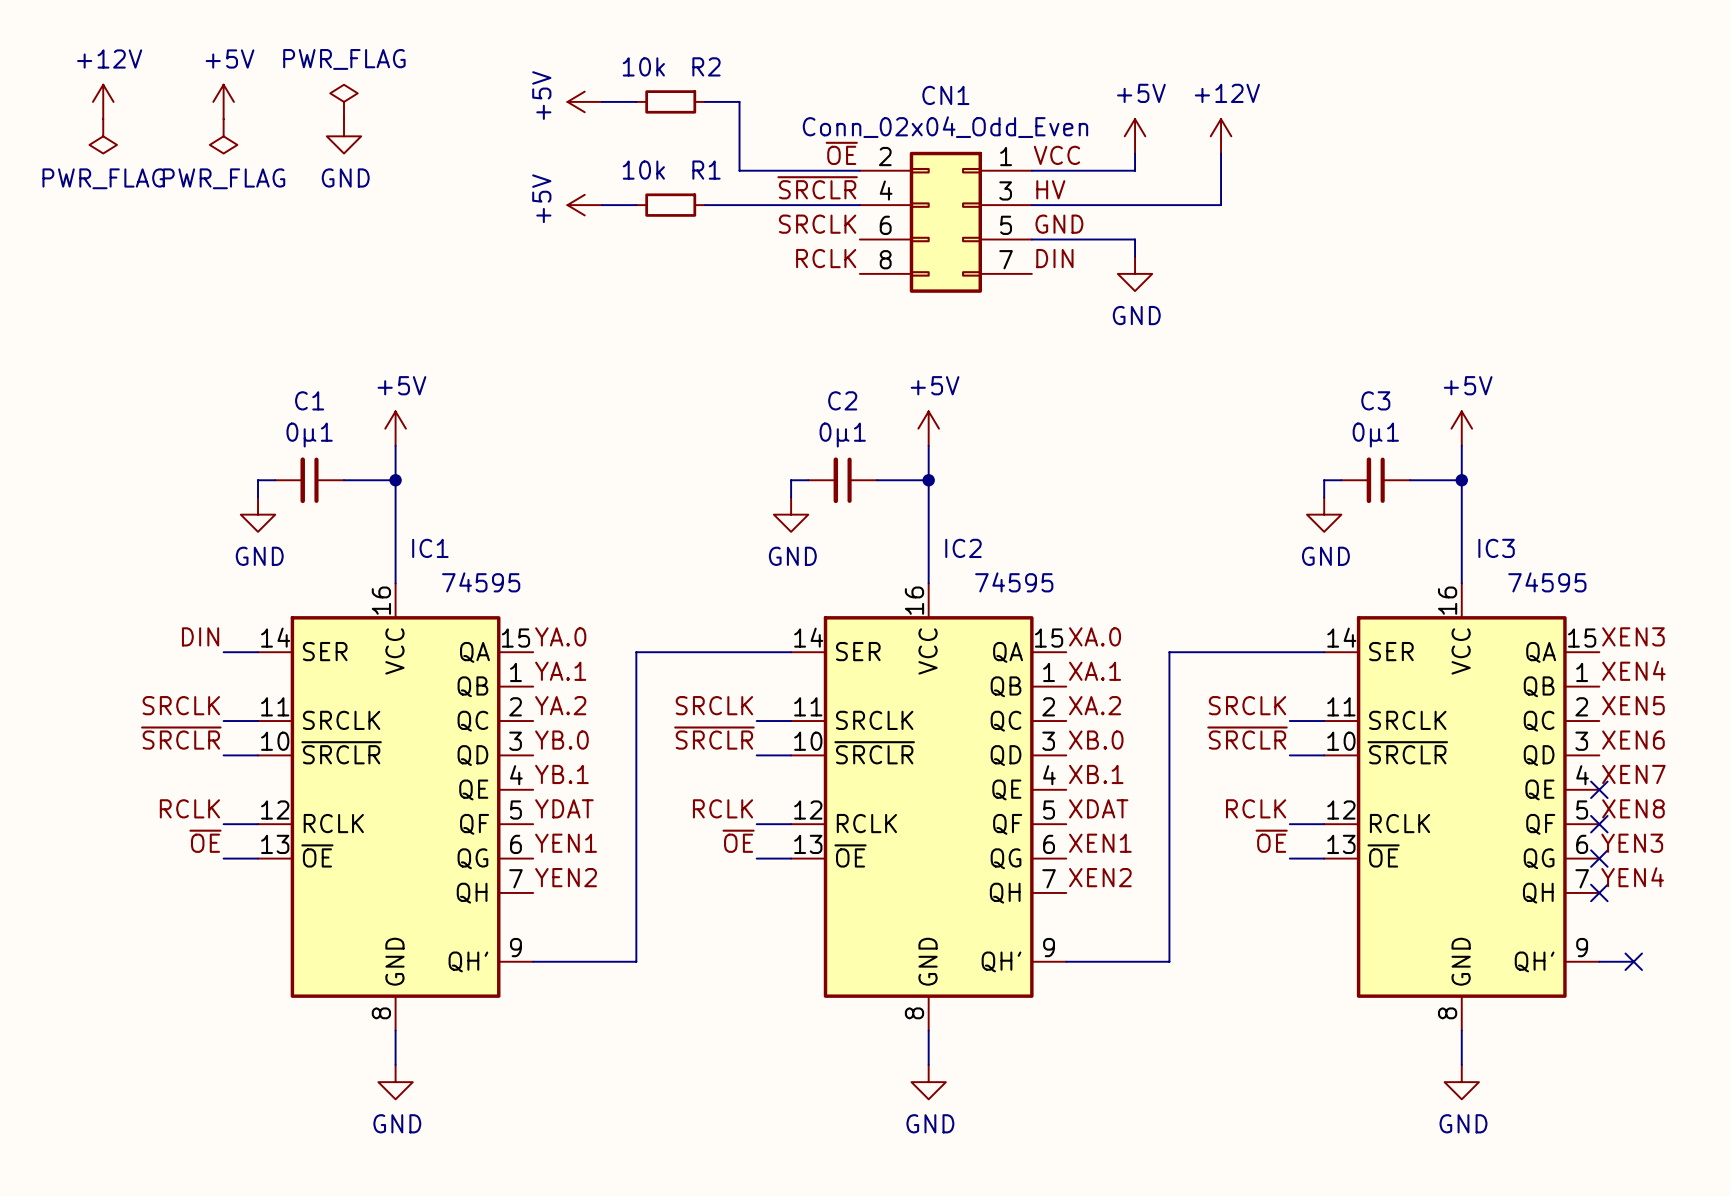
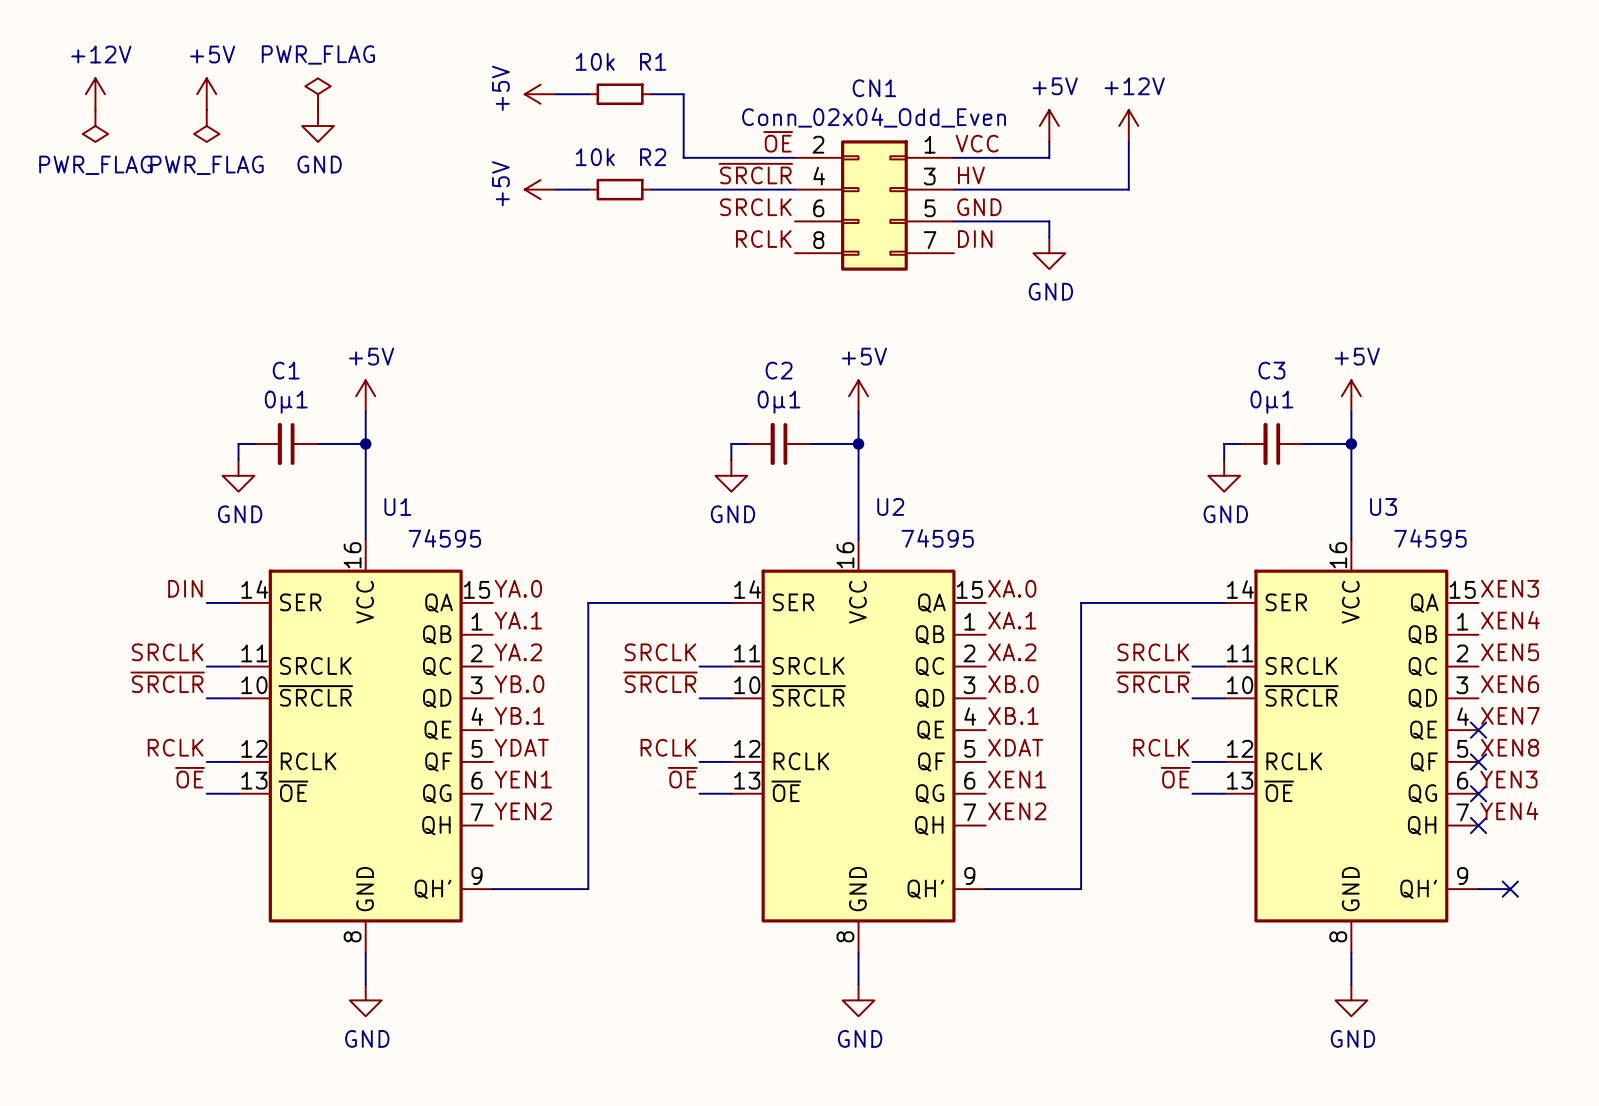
R2 name: R2 (706, 66) -> R1 (653, 61)
R1 name: R1 (706, 170) -> R2 (653, 157)
IC1 name: IC1 (430, 548) -> U1 (397, 506)
IC2 name: IC2 (963, 548) -> U2 (890, 506)
IC3 name: IC3 (1496, 548) -> U3 (1383, 506)

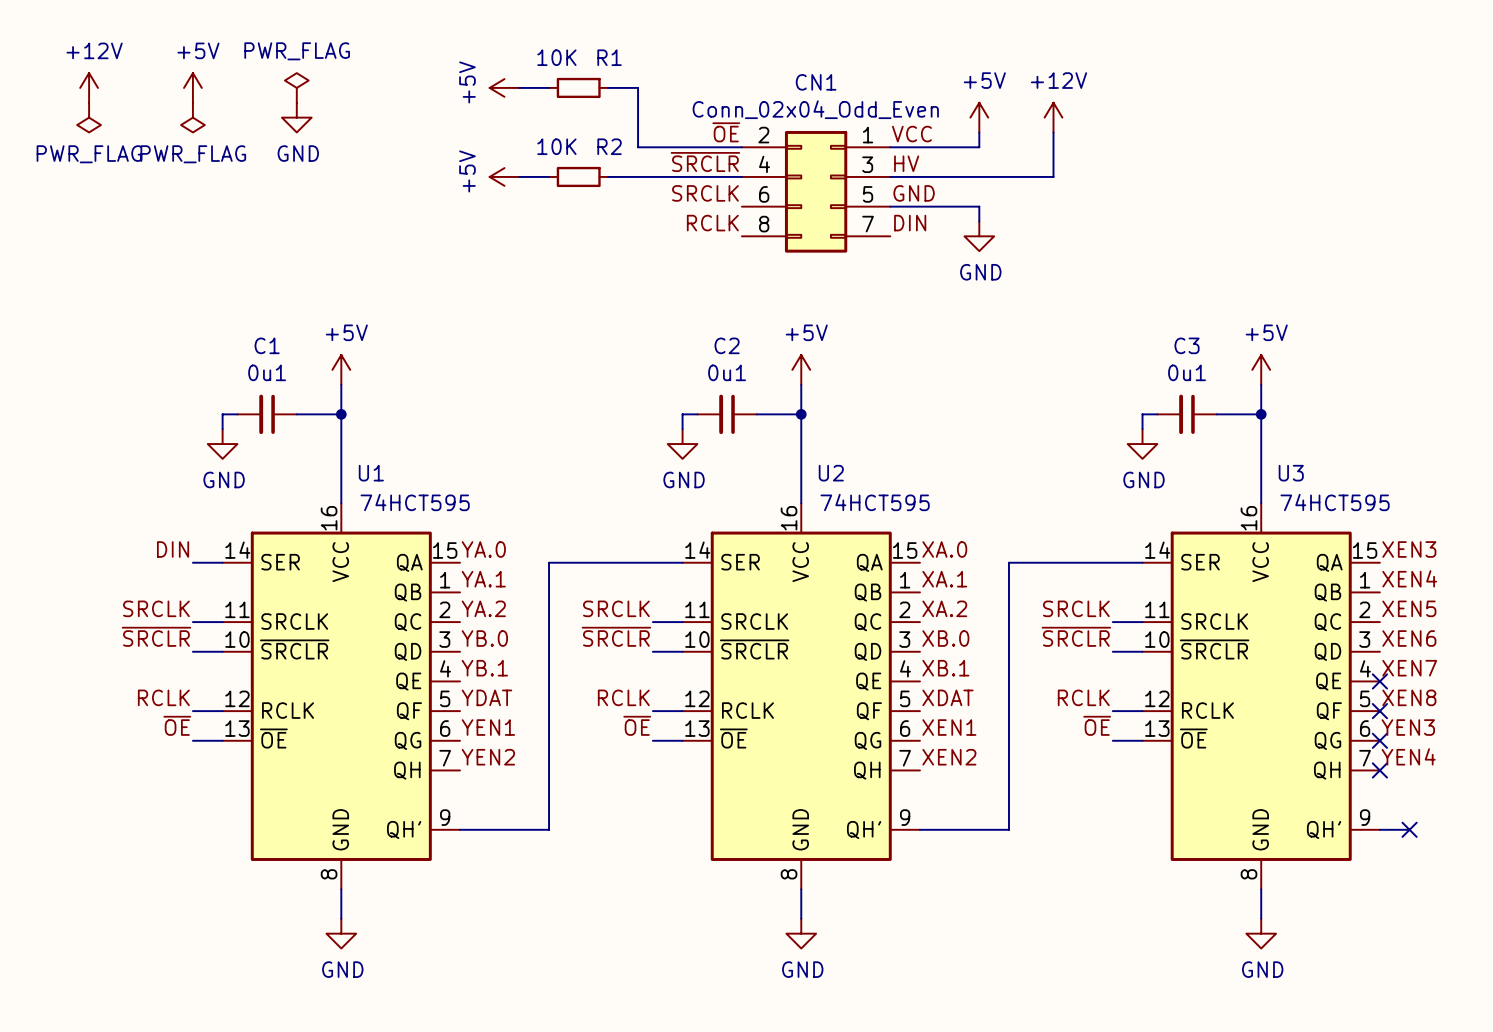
R1 value: 10k (595, 61) -> 10K (556, 57)
R2 value: 10k (595, 157) -> 10K (556, 146)
C1 value: 0µ1 (286, 402) -> 0u1 (267, 372)
C2 value: 0µ1 (779, 402) -> 0u1 (727, 372)
C3 value: 0µ1 (1271, 402) -> 0u1 (1187, 372)
U1 value: 74595 (444, 538) -> 74HCT595 (415, 502)
U2 value: 74595 (937, 538) -> 74HCT595 (875, 502)
U3 value: 74595 (1430, 538) -> 74HCT595 (1335, 502)

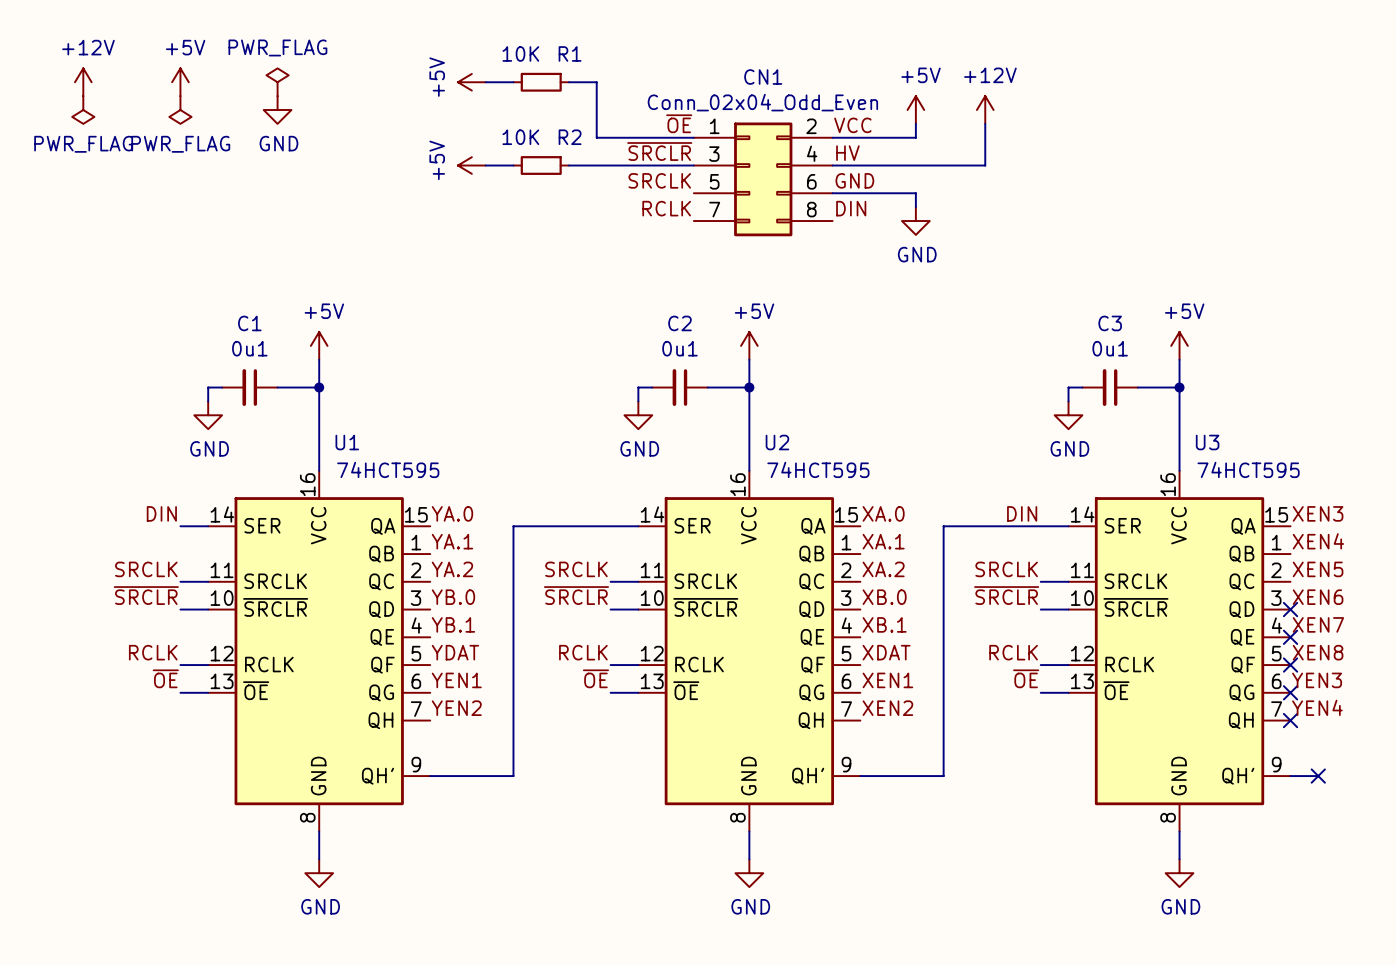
CN1 flip: as is (816, 191) -> left-right (763, 179)
label: none -> DIN (1022, 513)
no-connect mark: none -> (1290, 609)

